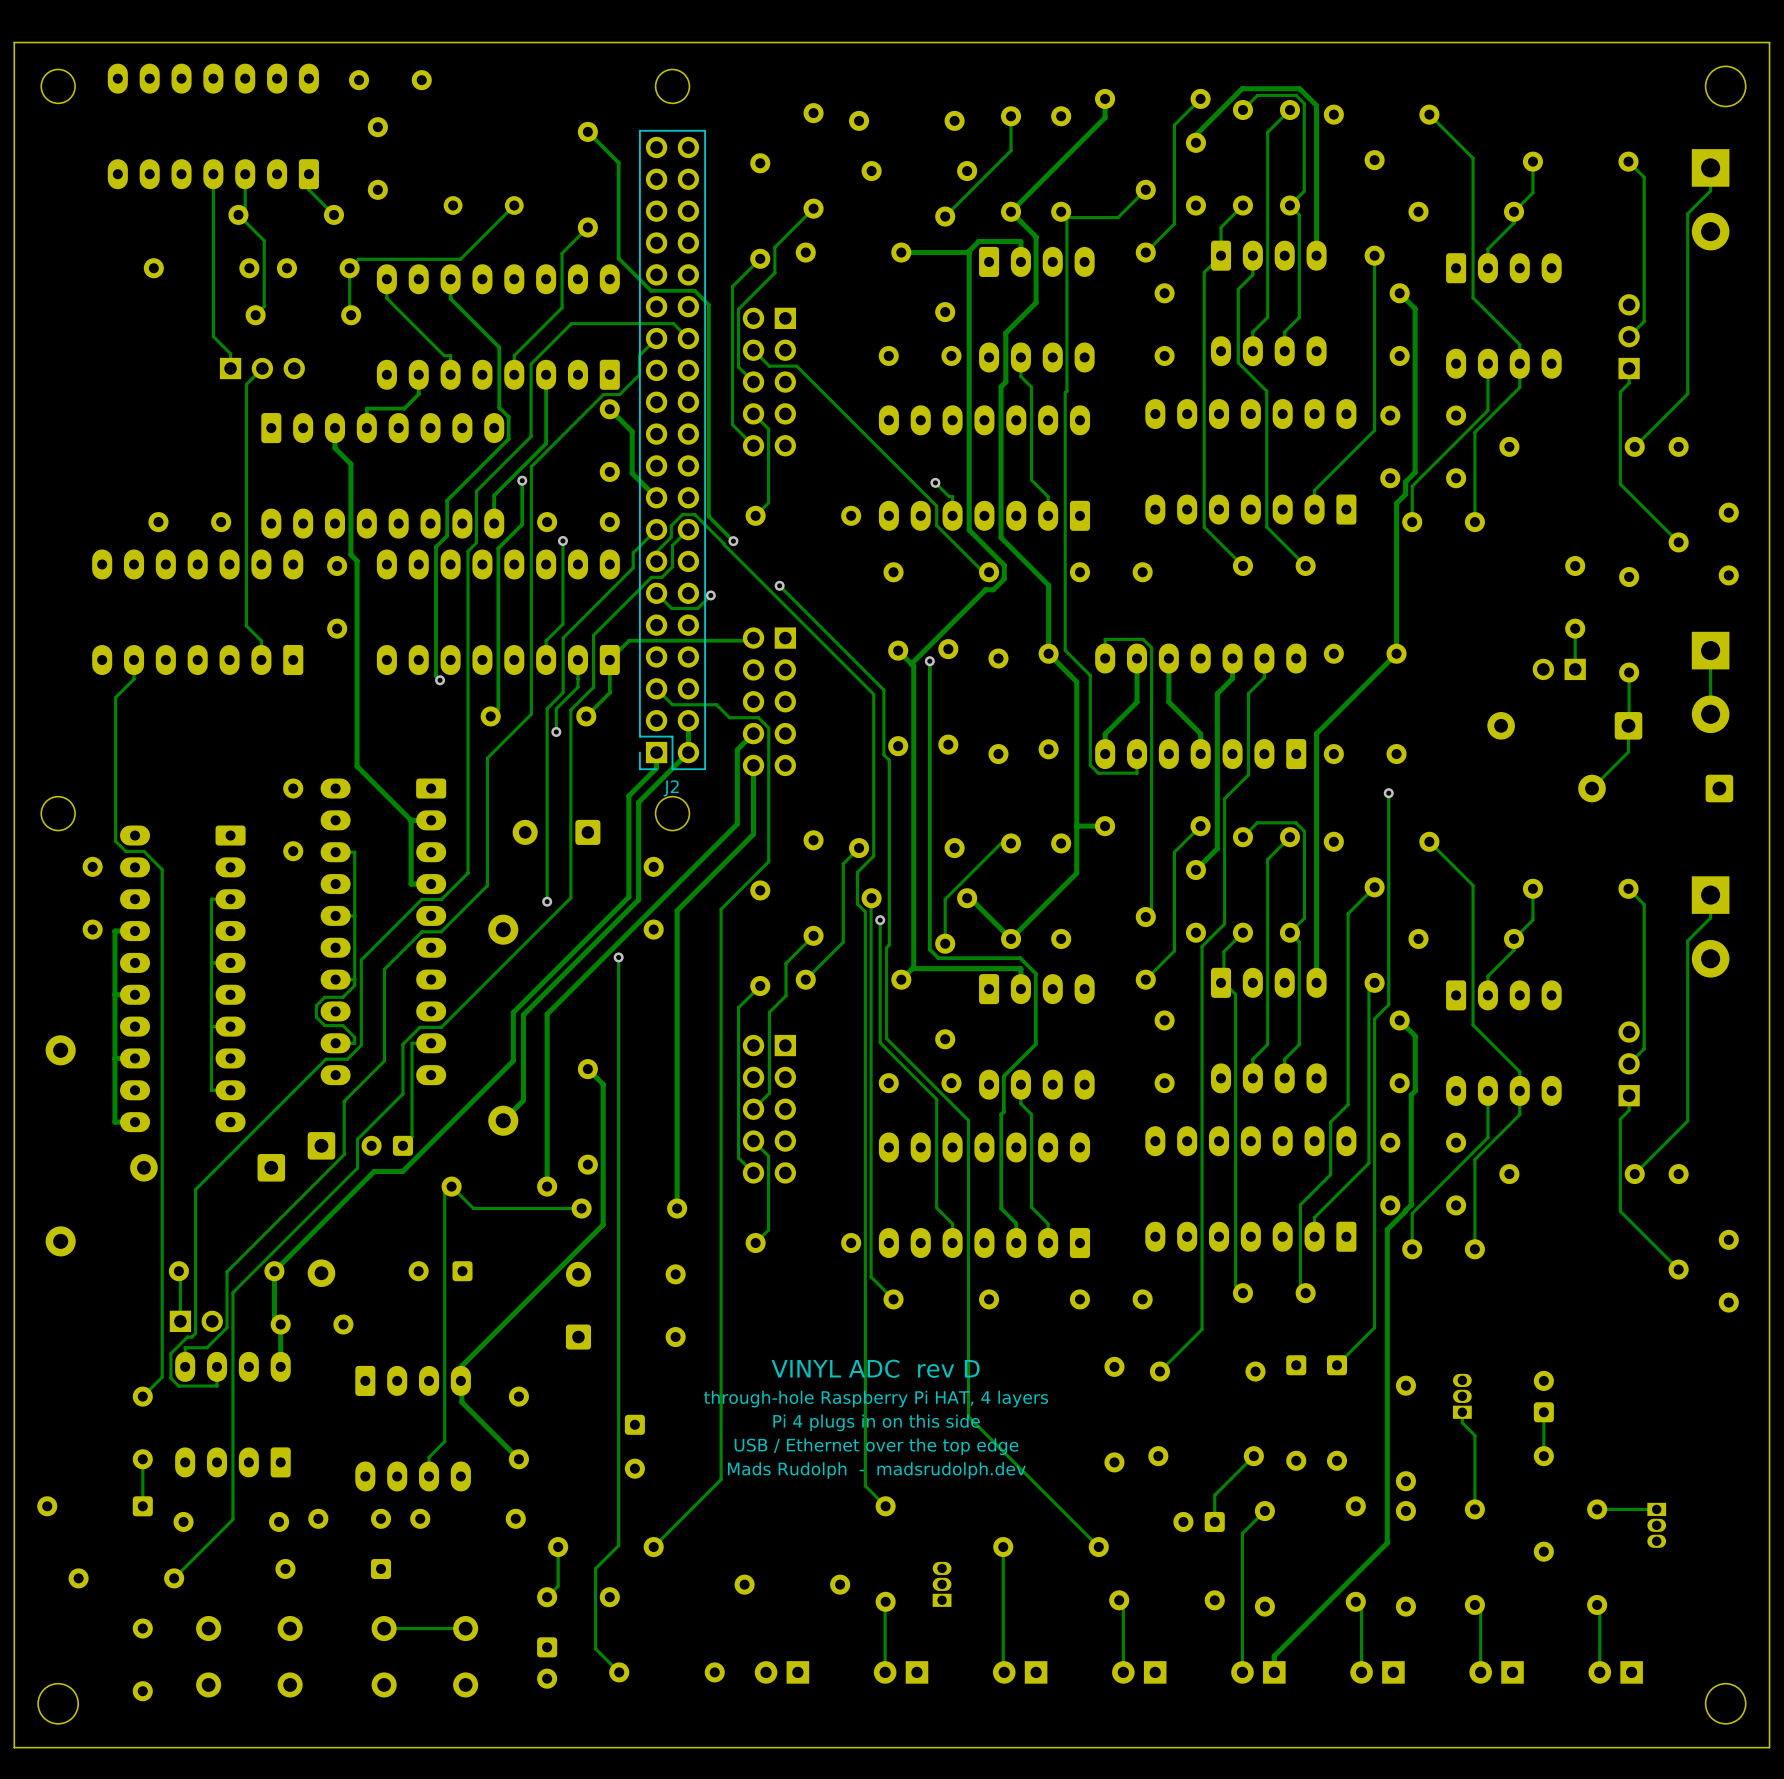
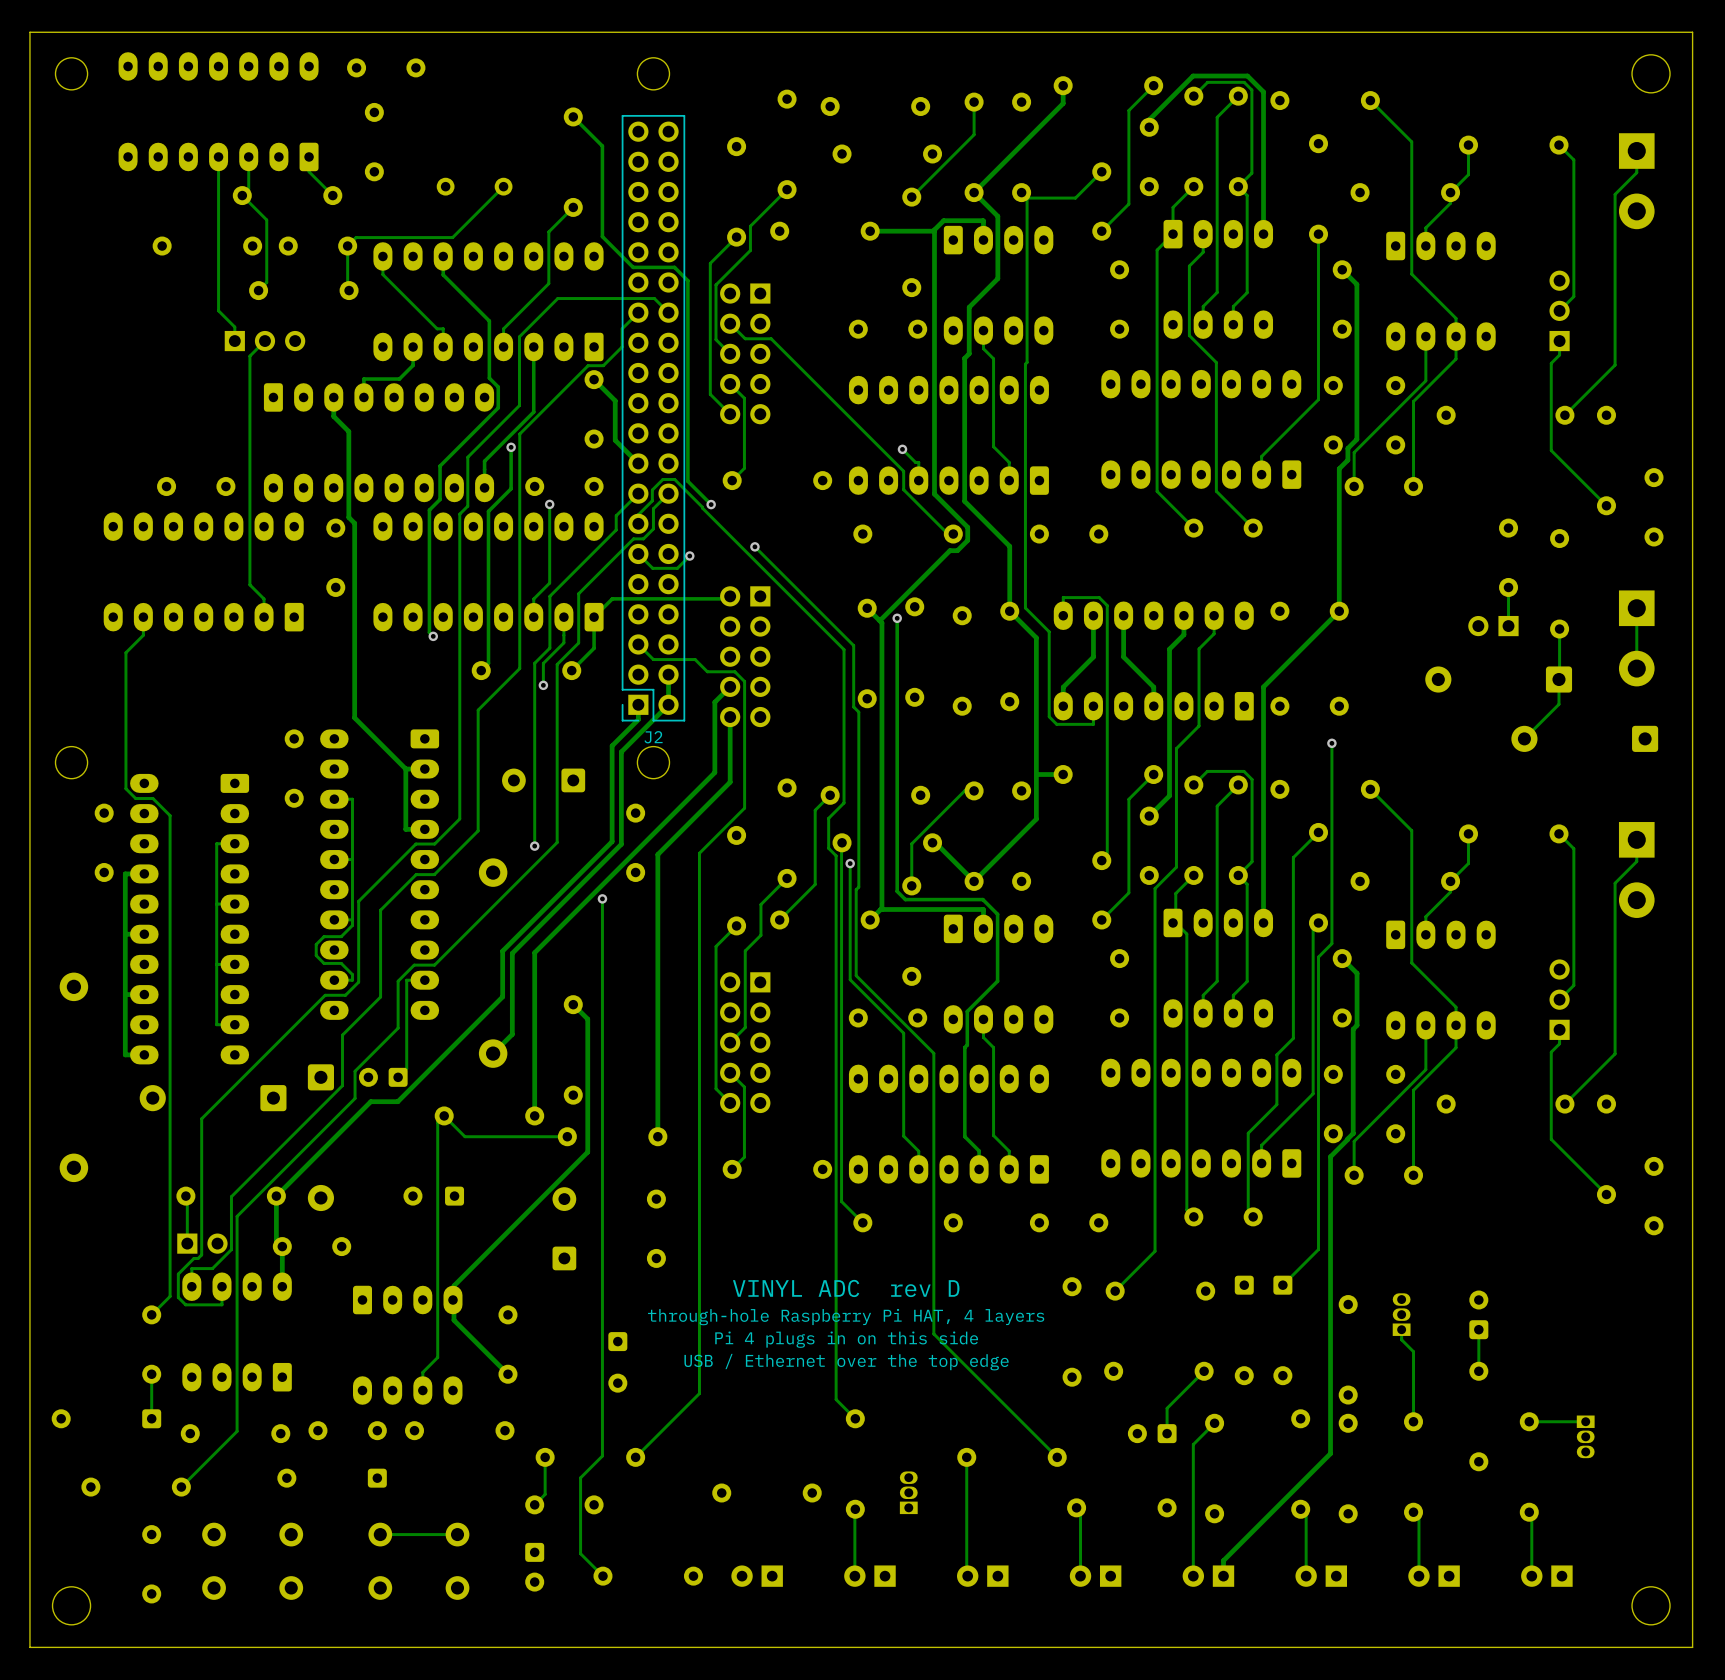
text: Mads Rudolph - madsrudolph.dev (876, 1470) -> none

